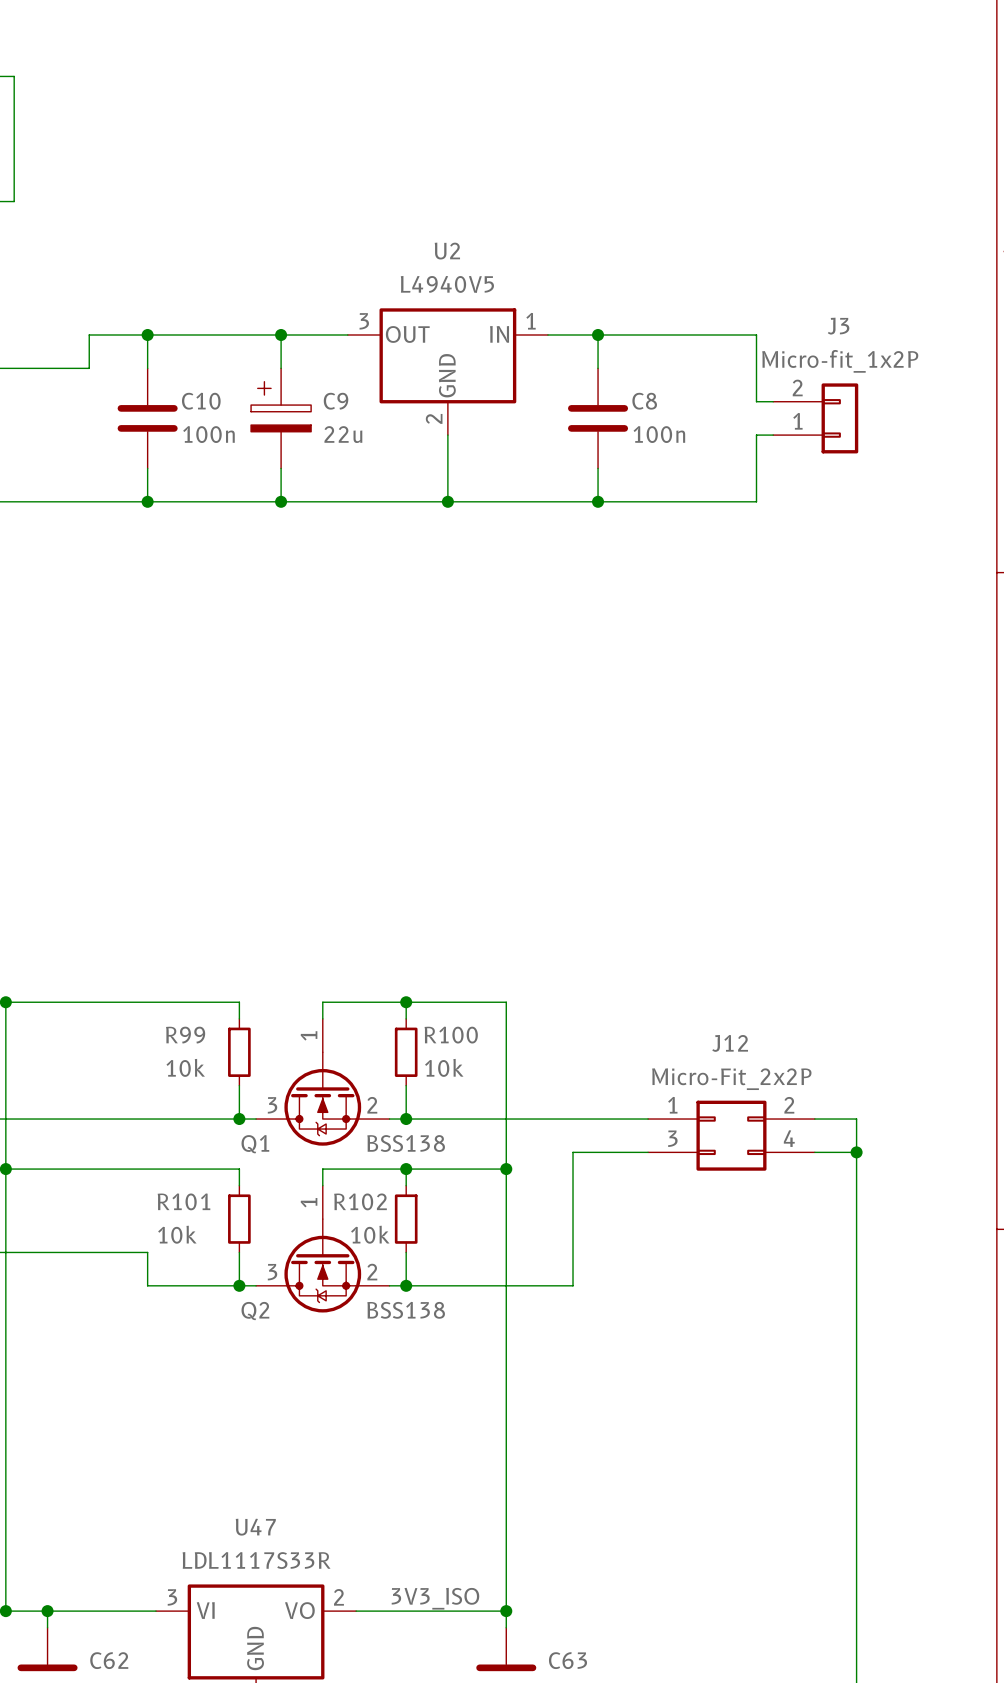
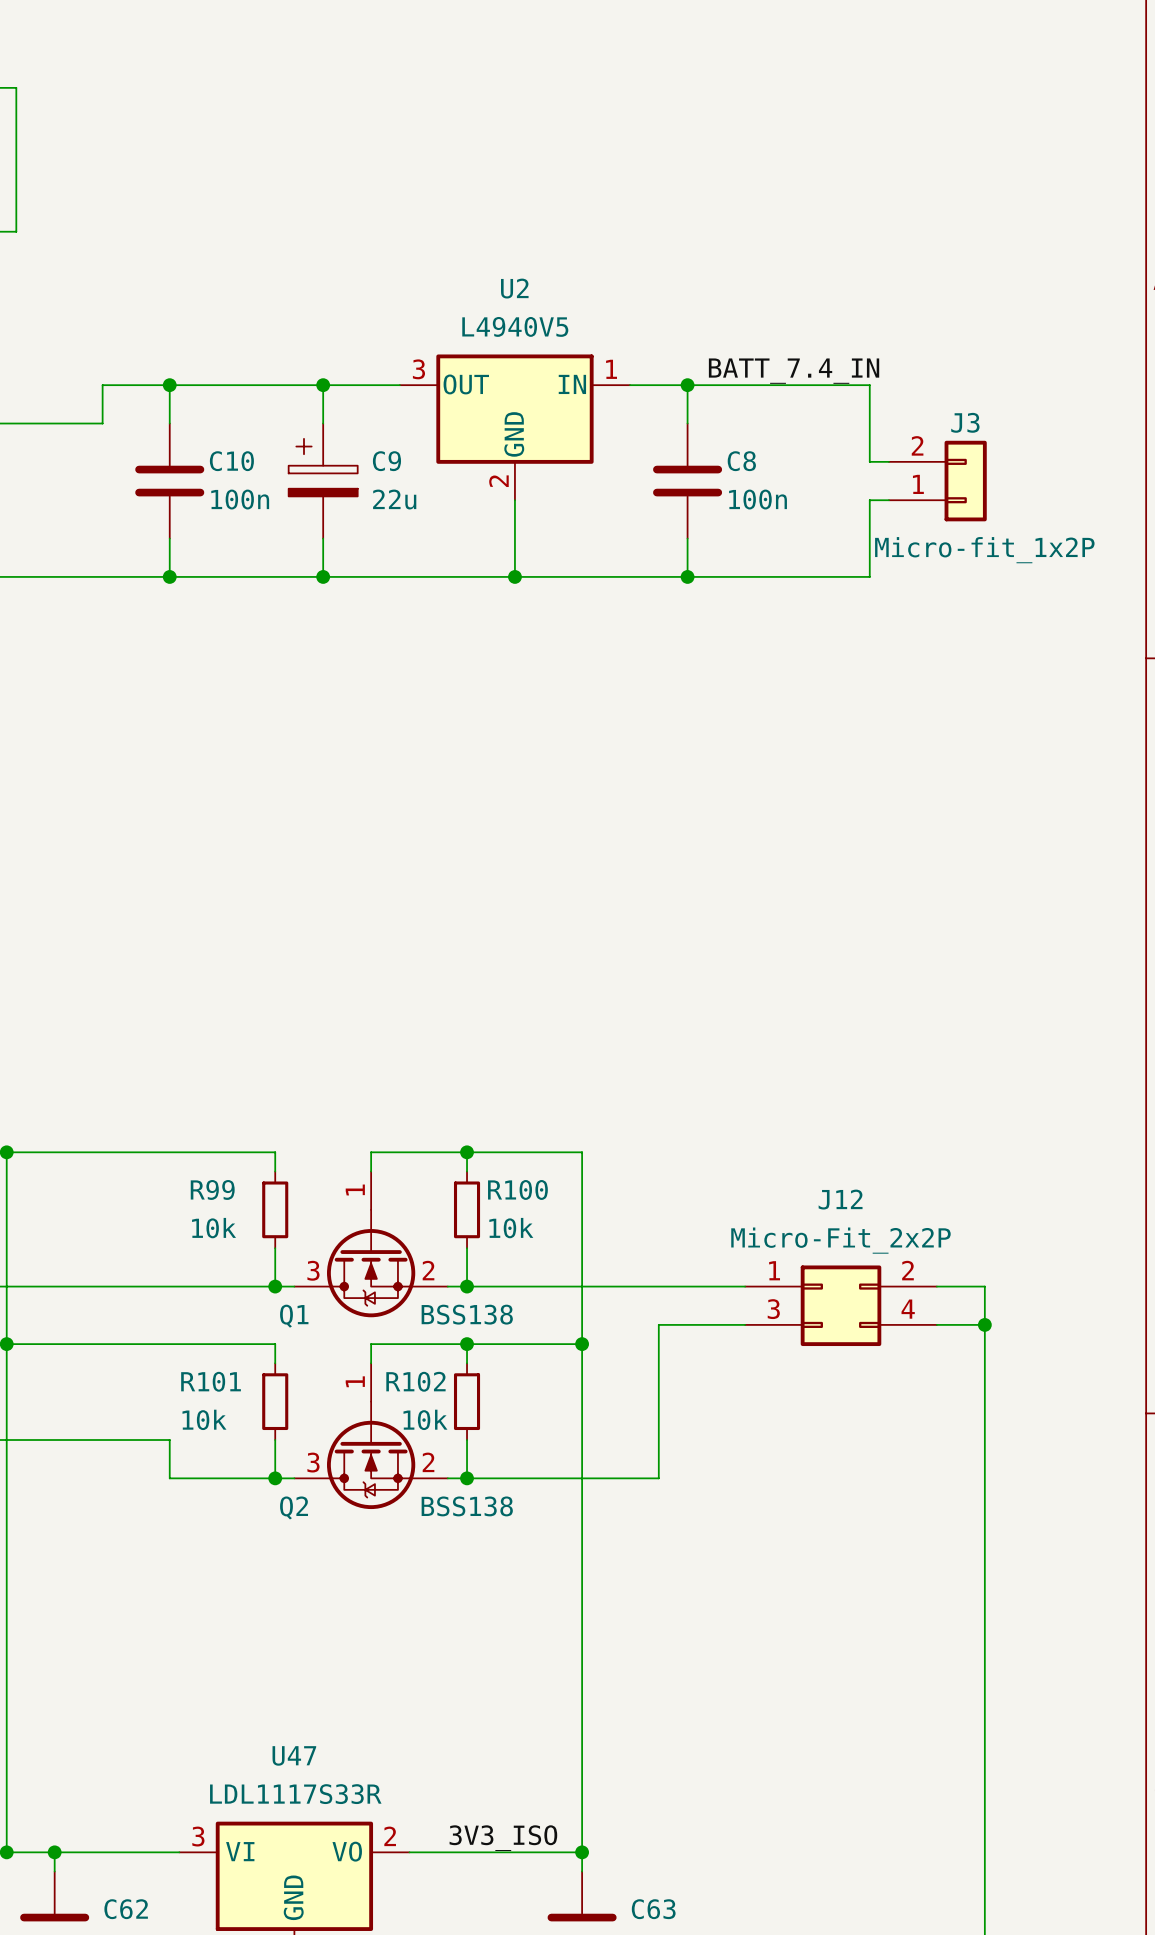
label: none -> BATT_7.4_IN (794, 371)
J3 name position: J3 (838, 326) -> J3 (965, 422)
J3 value position: Micro-fit_1x2P (840, 361) -> Micro-fit_1x2P (984, 550)

